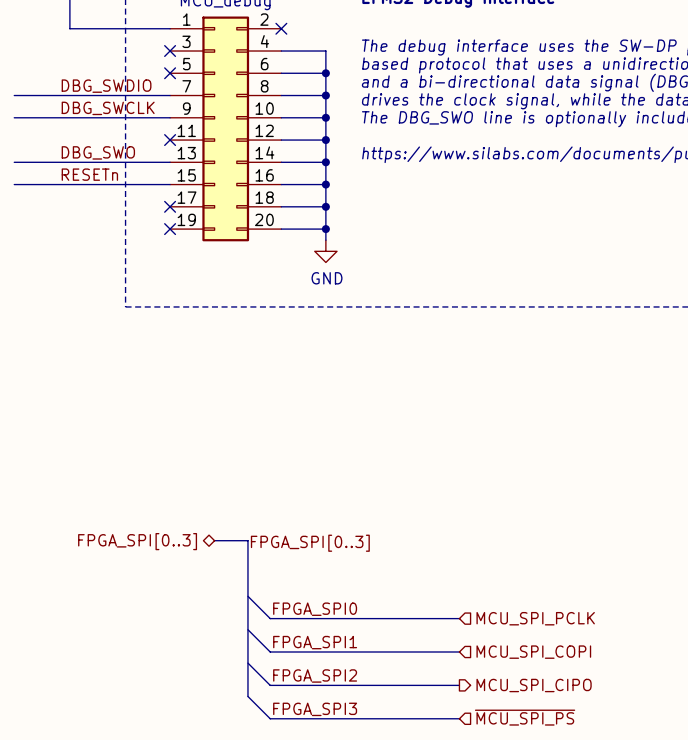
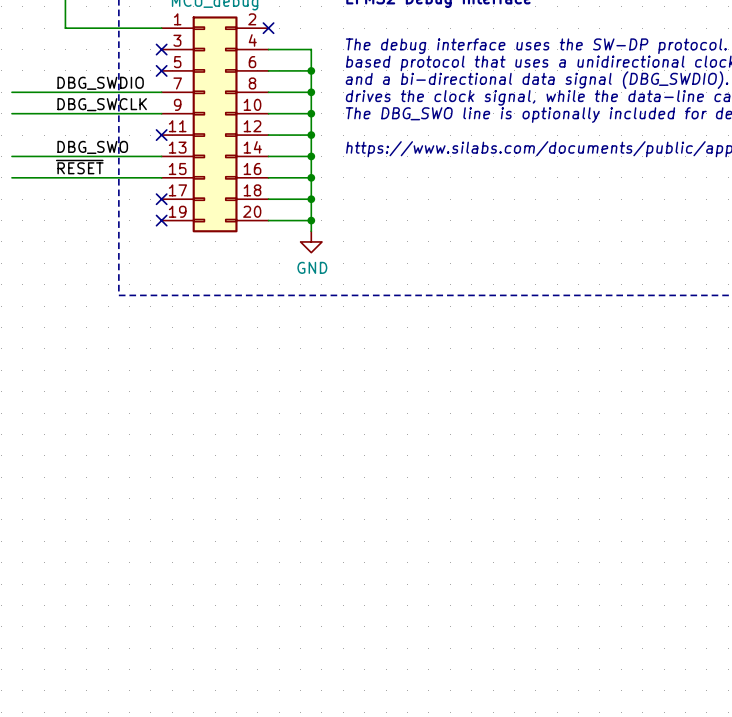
label: RESETn (89, 174) -> ~{RESET} (79, 167)
bus: (214, 540) (247, 540) (247, 696) -> none
hierarchical label: FPGA_SPI[0..3] (137, 541) -> none
label: FPGA_SPI[0..3] (310, 543) -> none
wire: (247, 596) (270, 618) (459, 618) -> none
label: FPGA_SPI0 (315, 609) -> none
hierarchical label: MCU_SPI_PCLK (535, 618) -> none
wire: (247, 629) (270, 651) (459, 651) -> none
label: FPGA_SPI1 (315, 642) -> none
hierarchical label: MCU_SPI_COPI (533, 652) -> none
wire: (247, 663) (270, 685) (459, 685) -> none
label: FPGA_SPI2 (315, 675) -> none
hierarchical label: MCU_SPI_CIPO (534, 685) -> none
wire: (247, 696) (270, 718) (459, 718) -> none
label: FPGA_SPI3 (315, 709) -> none
hierarchical label: ~{MCU_SPI_PS} (525, 717) -> none

